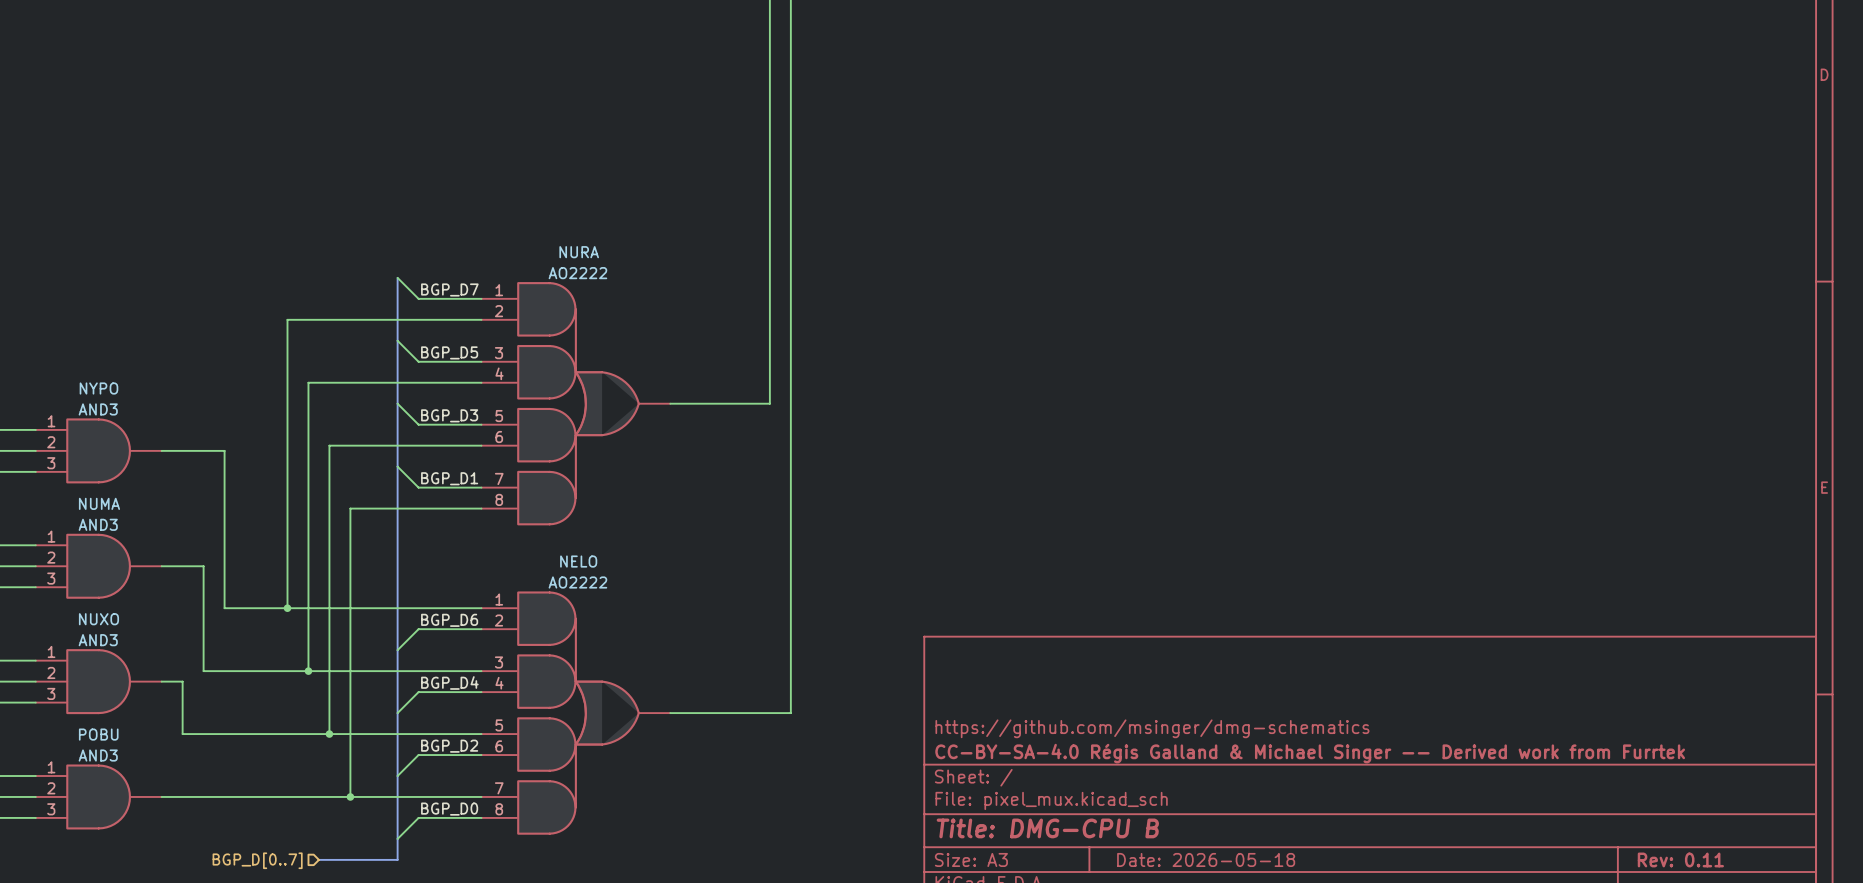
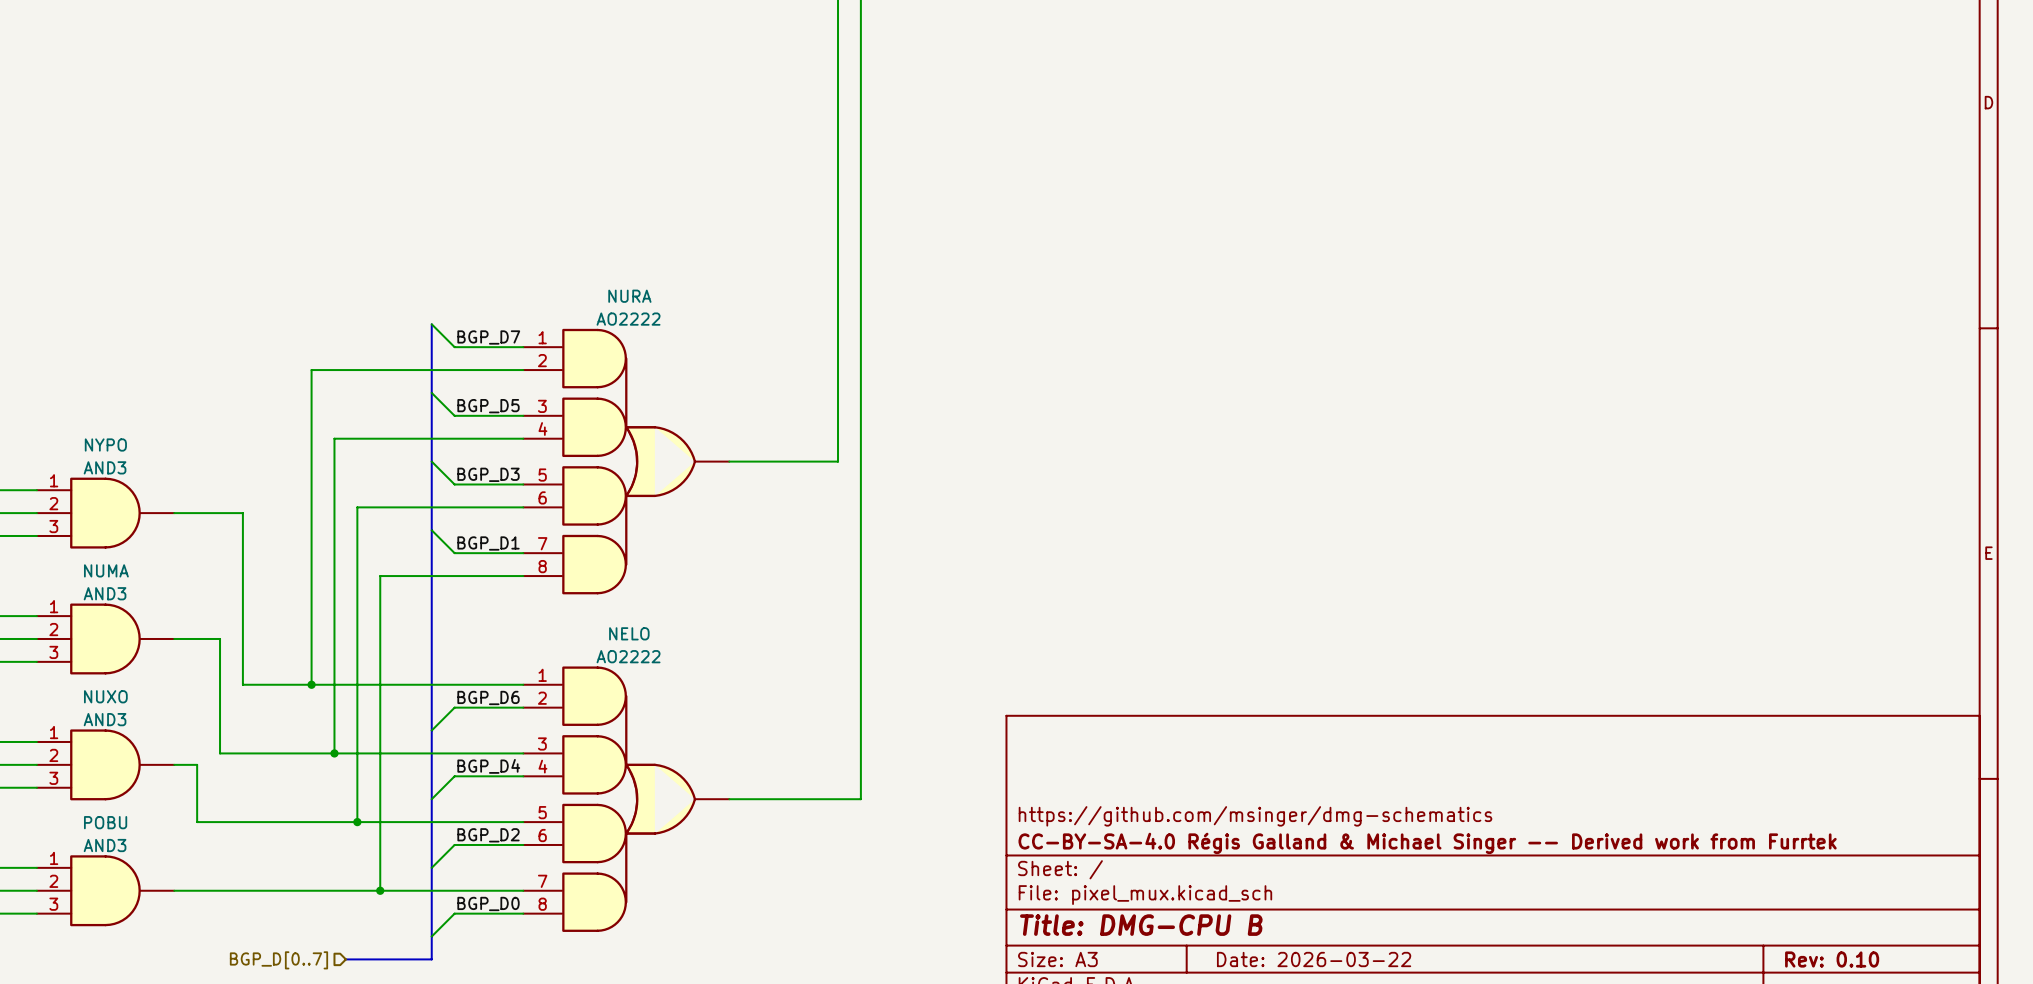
title block: Date: 2026-05-18 (1206, 859) -> Date: 2026-03-22 (1314, 959)
title block: Rev: 0.11 (1680, 859) -> Rev: 0.10 (1832, 959)

